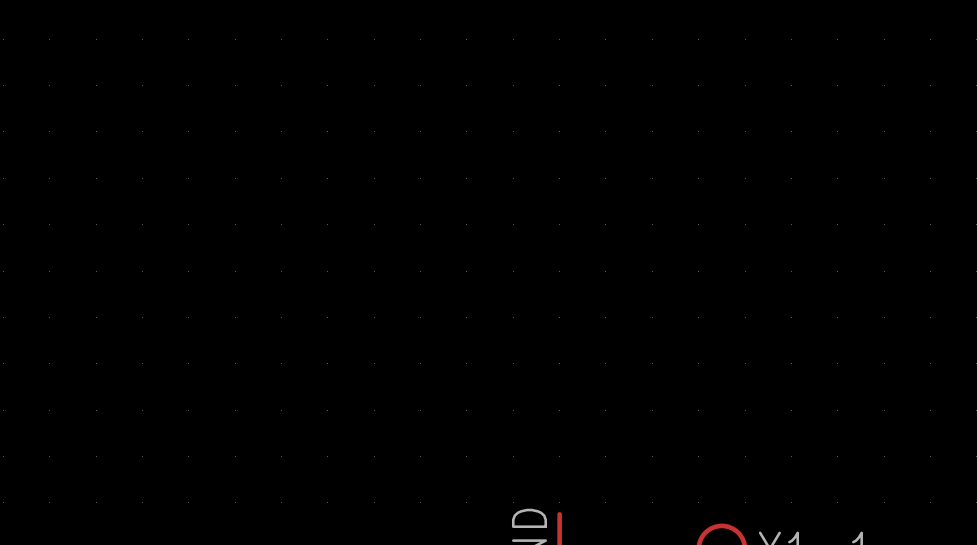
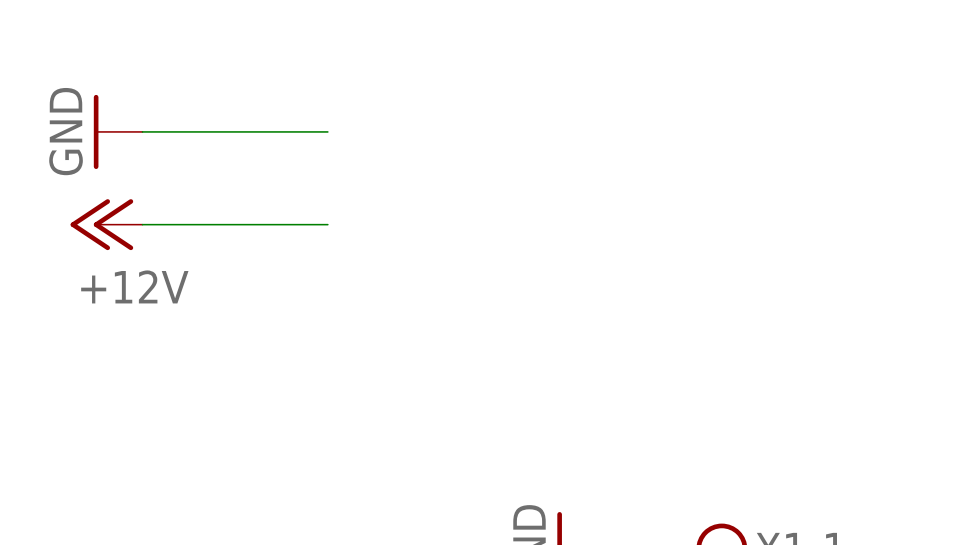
power symbol: none -> GND (118, 131)
wire: none -> (142, 131) (327, 131)
power symbol: none -> +12V (106, 224)
wire: none -> (142, 224) (327, 224)

